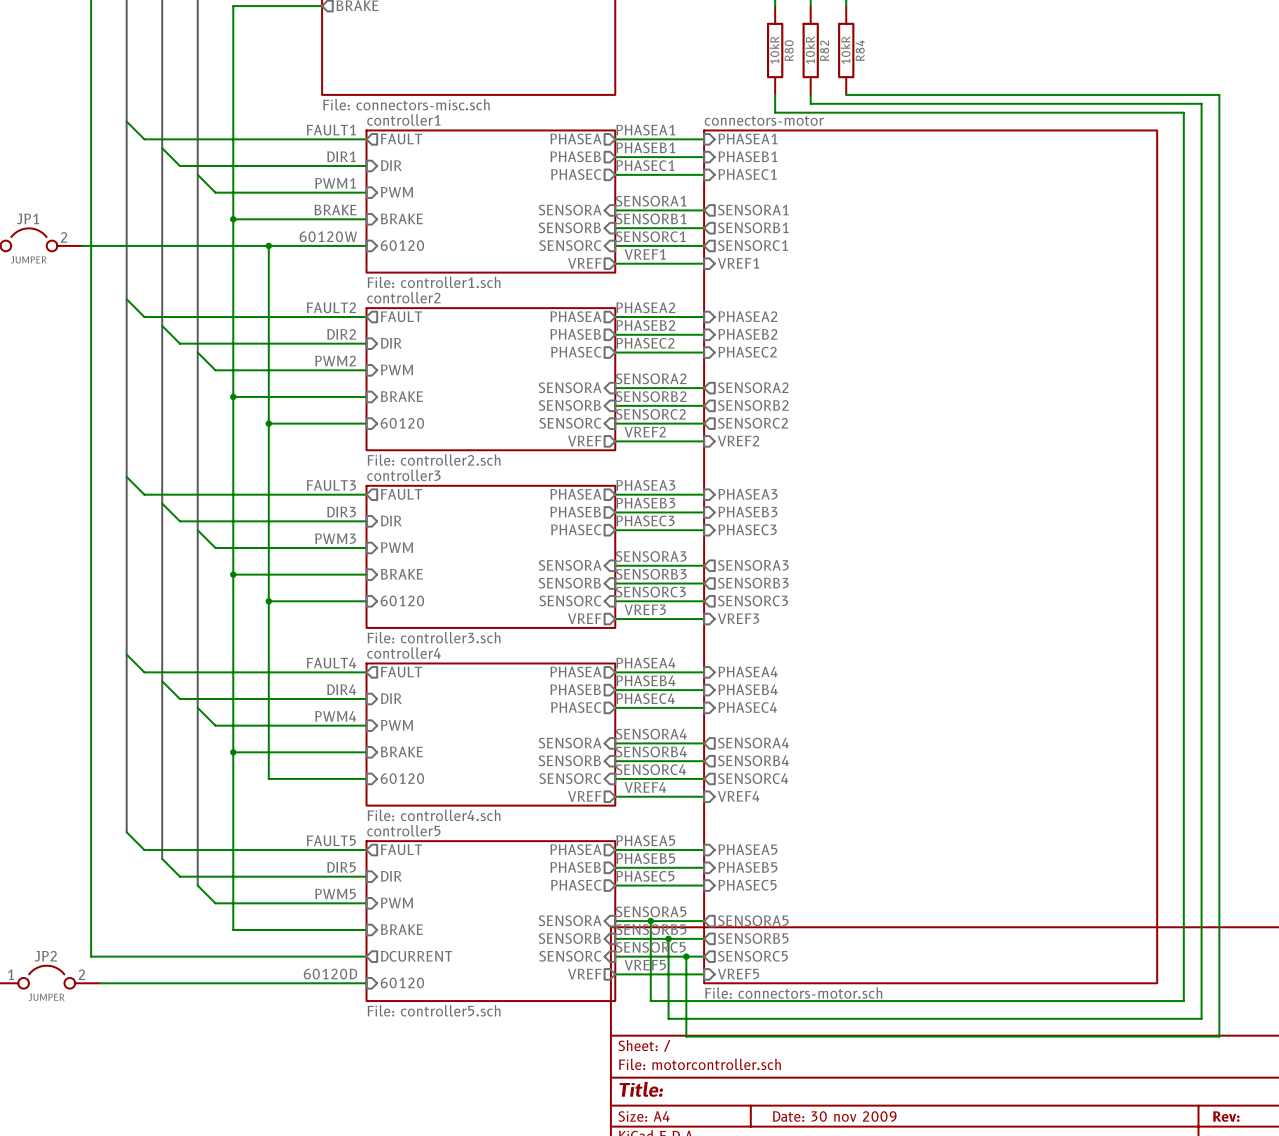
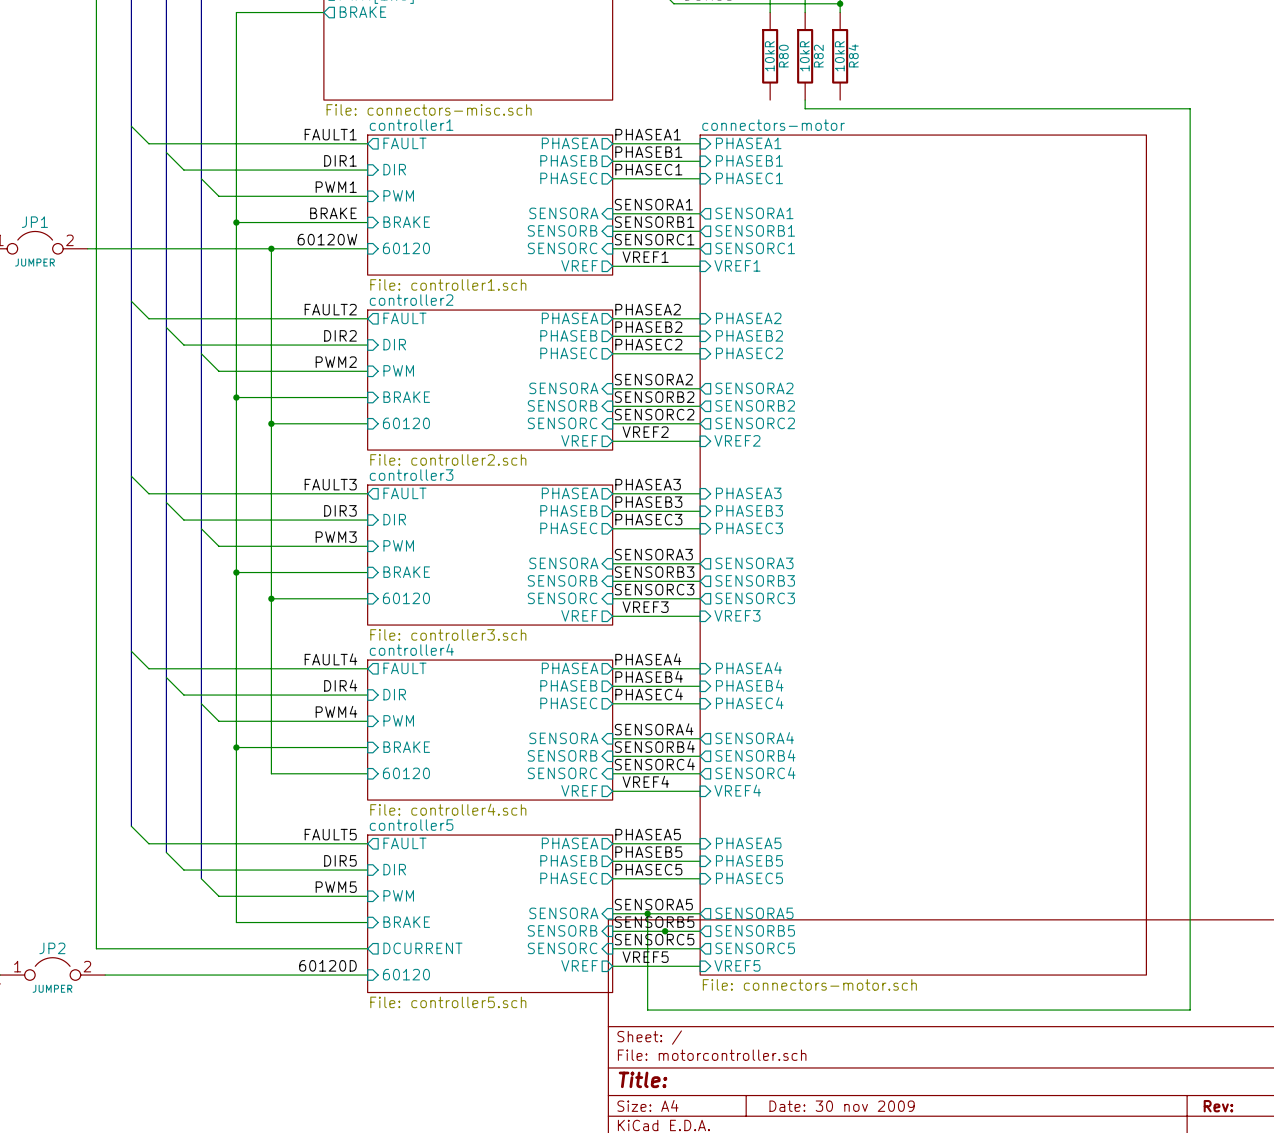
wire: (775, 94) (775, 112) (1183, 112) (1183, 1001) (650, 1001) -> none
wire: (846, 94) (1219, 94) (1219, 1036) (686, 1036) (686, 956) -> none
wire: (668, 938) (668, 1018) -> (647, 992) (647, 1010) (665, 1010)
junction: (686, 956) -> none

